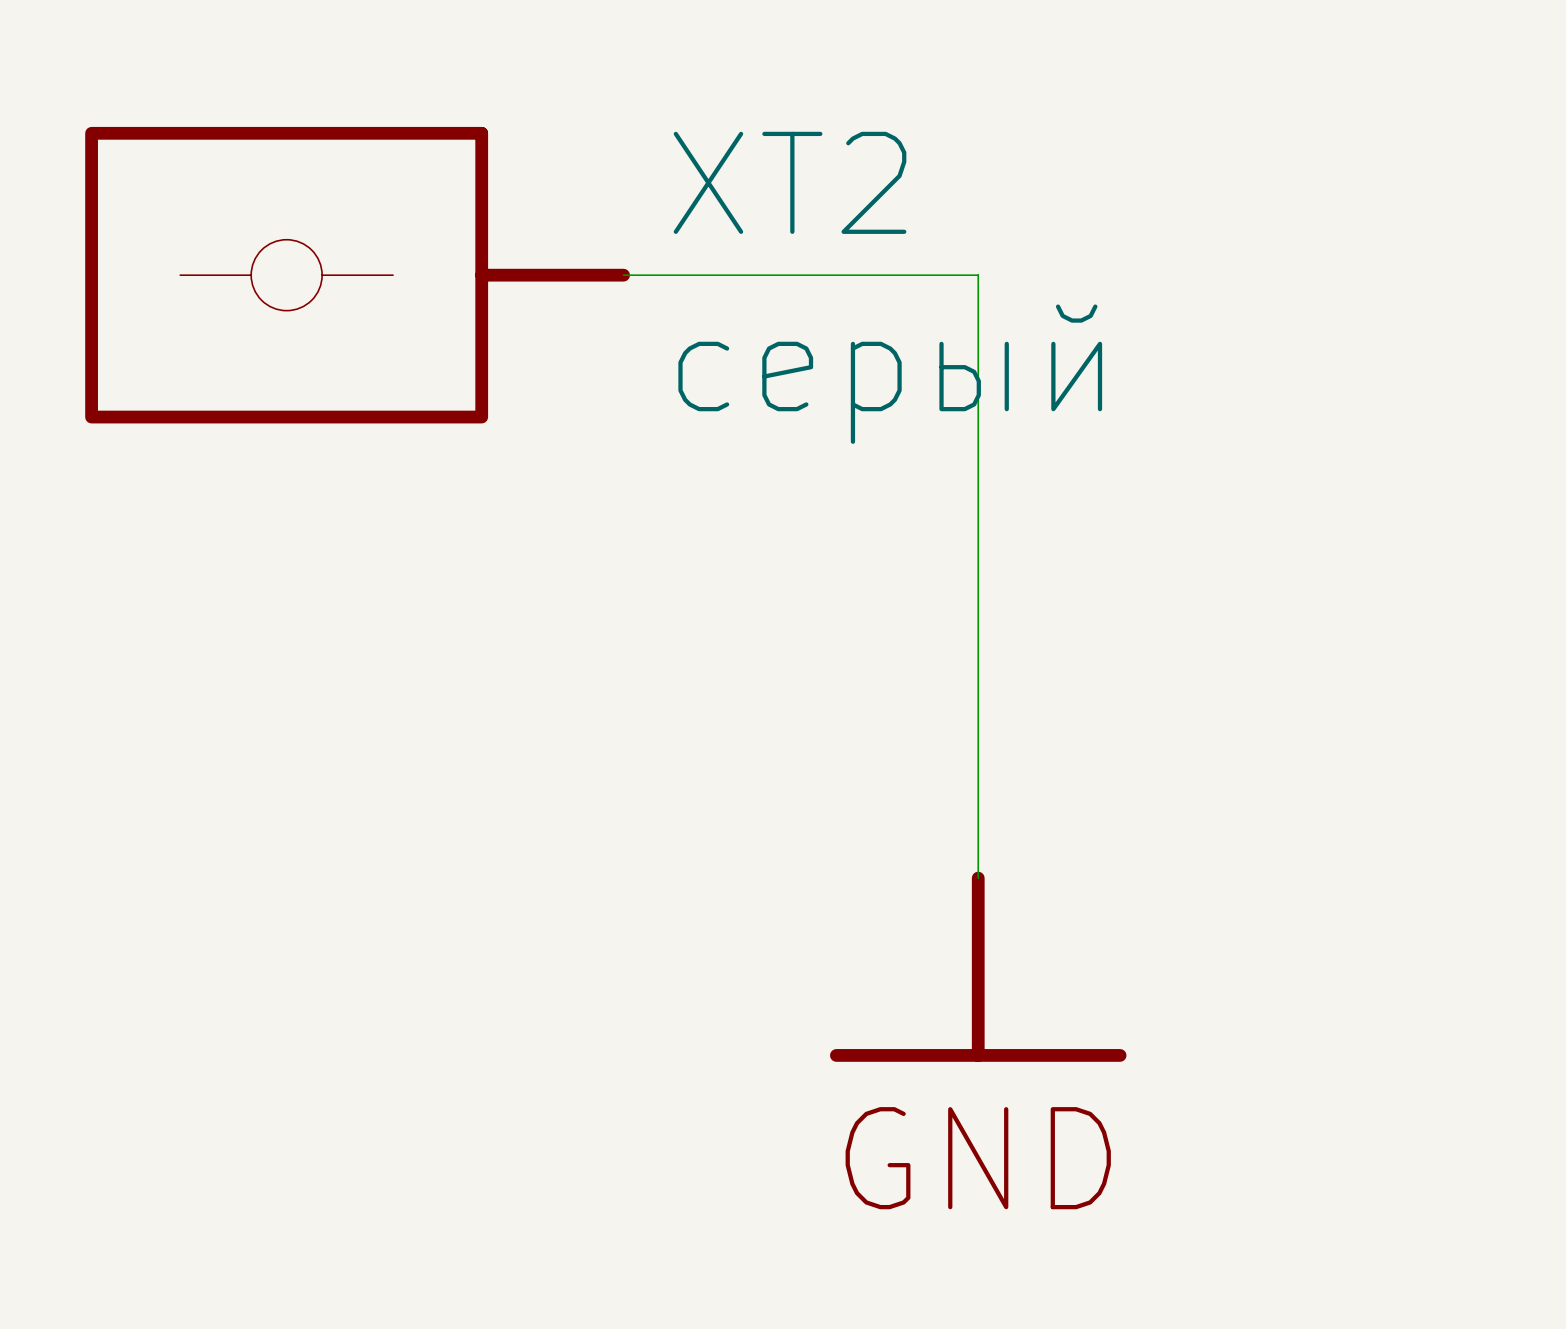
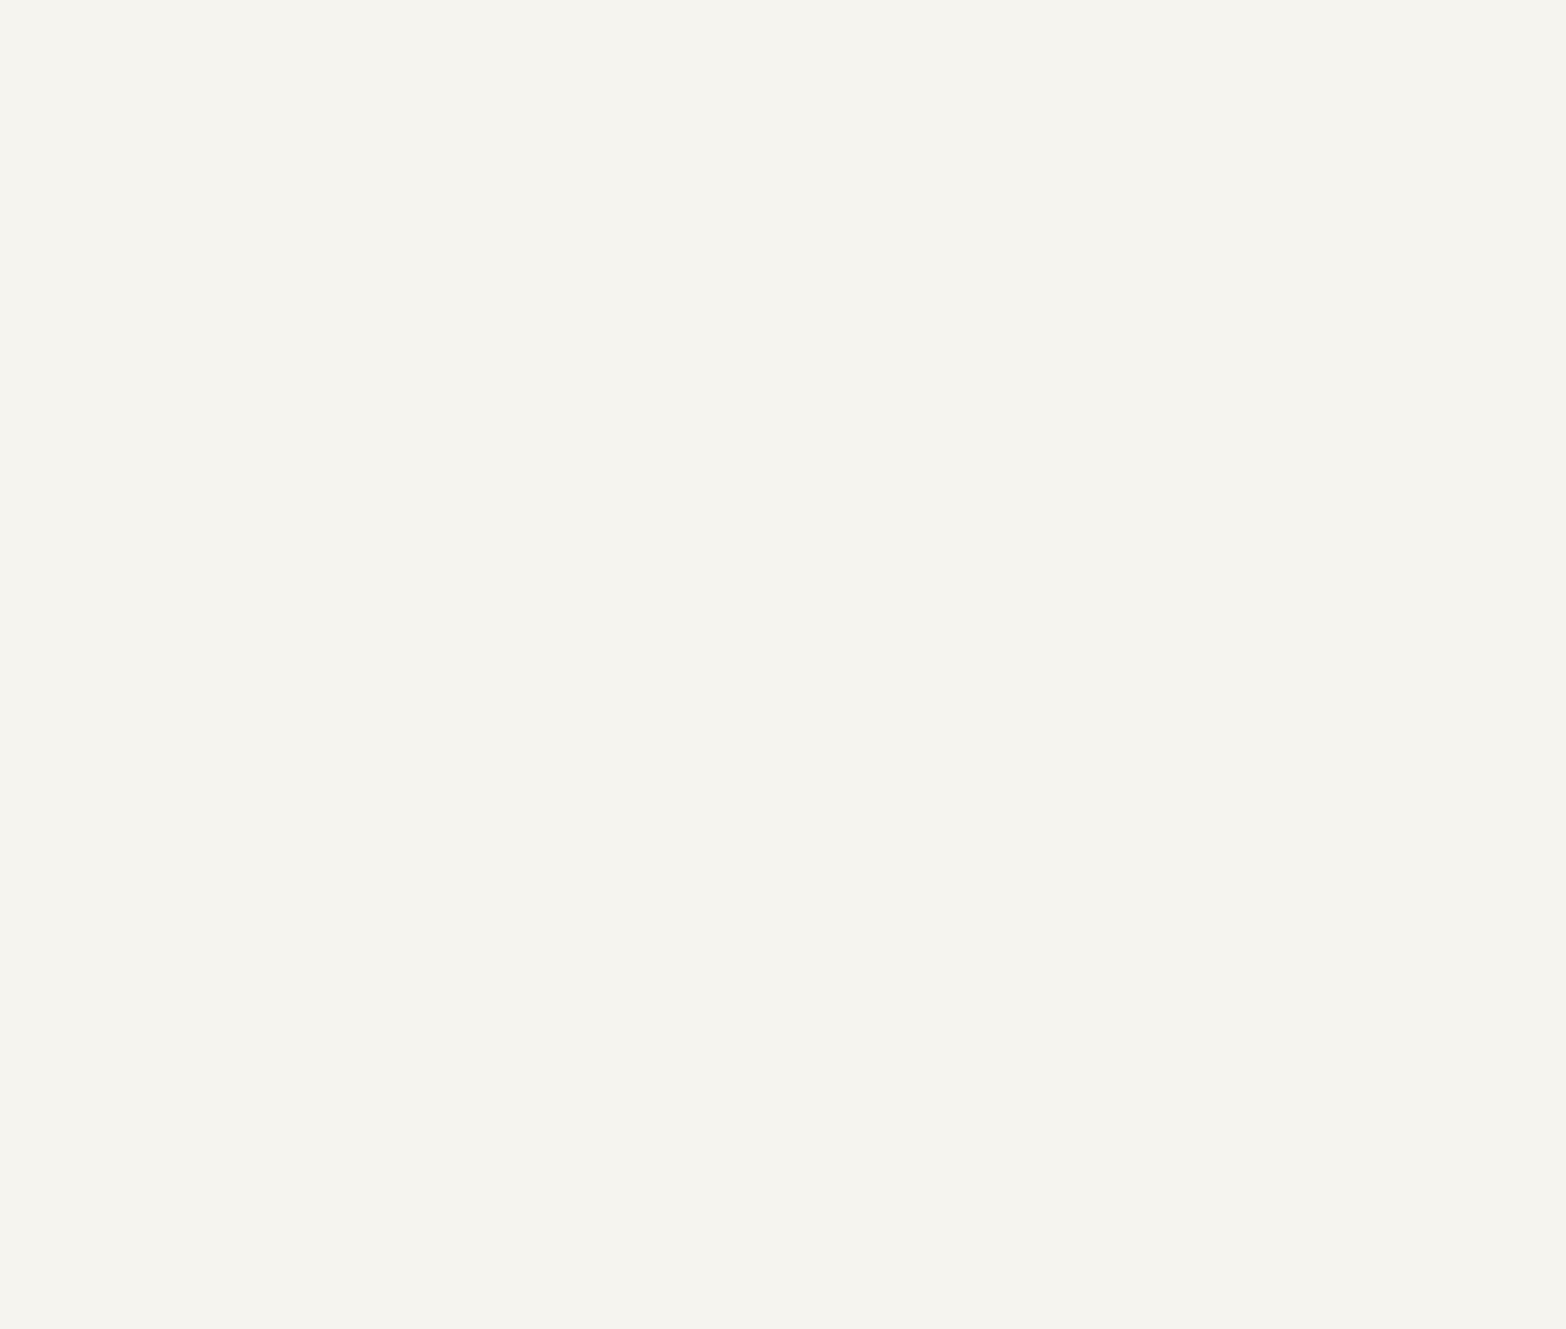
XT2: (357, 275) -> none
wire: (623, 275) (978, 275) (978, 878) -> none
power symbol: (978, 966) -> none

